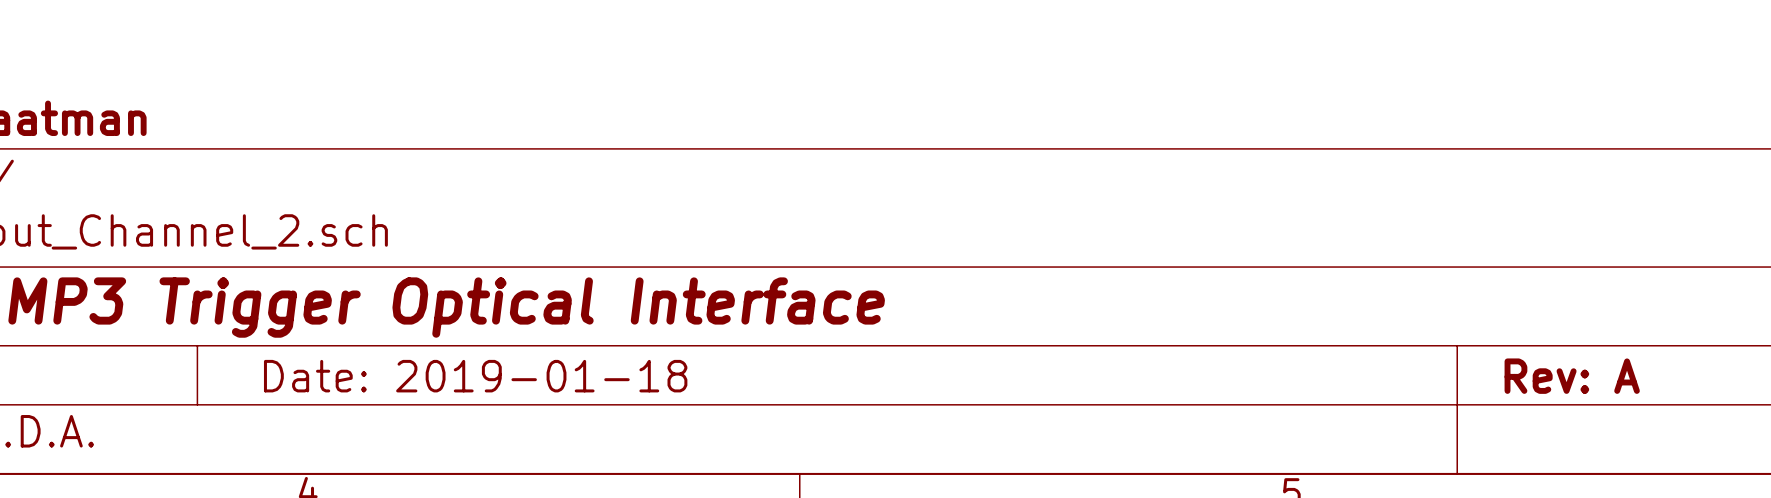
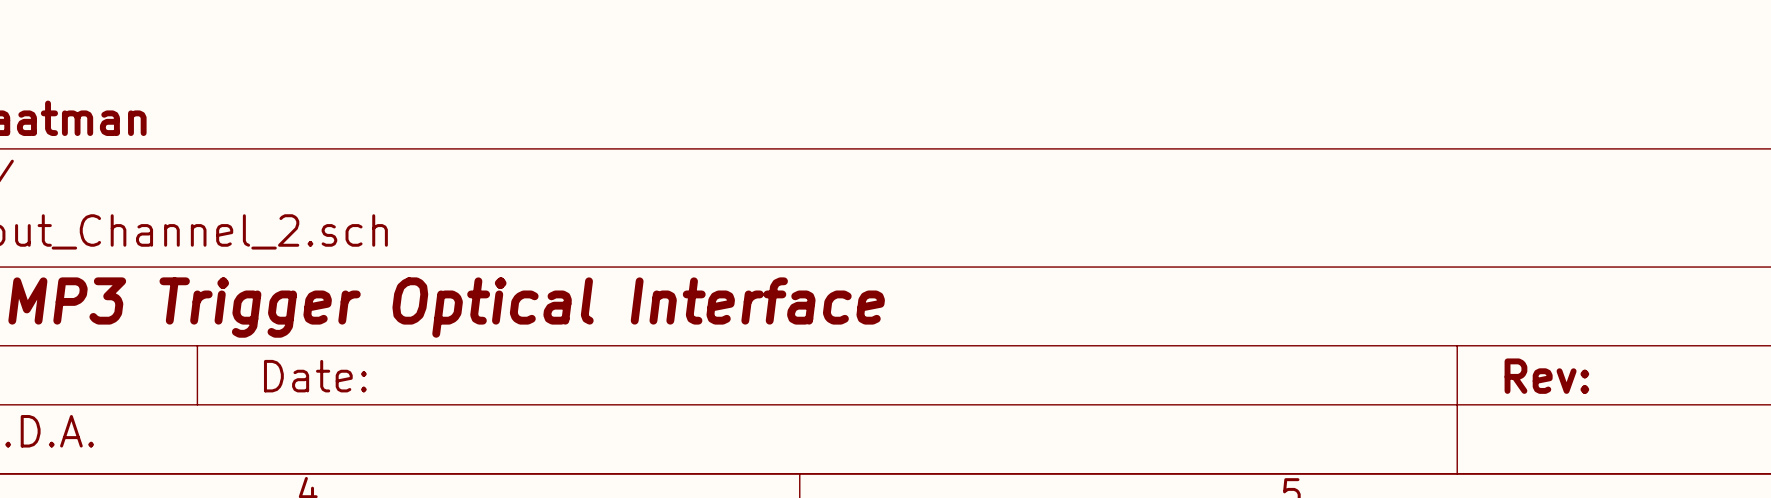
title block: Date: 2019-01-18 (475, 376) -> Date: (315, 376)
title block: Rev: A (1572, 376) -> Rev: (1546, 376)

